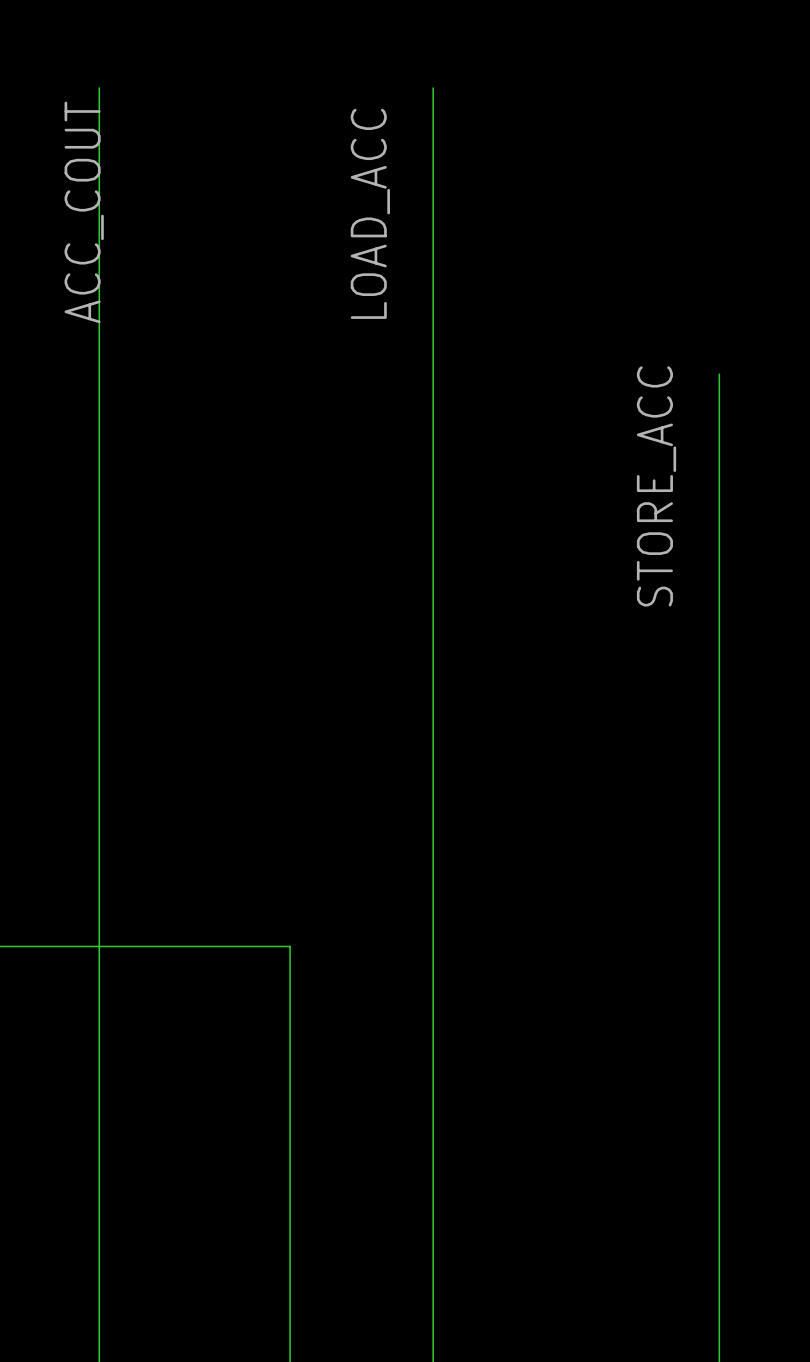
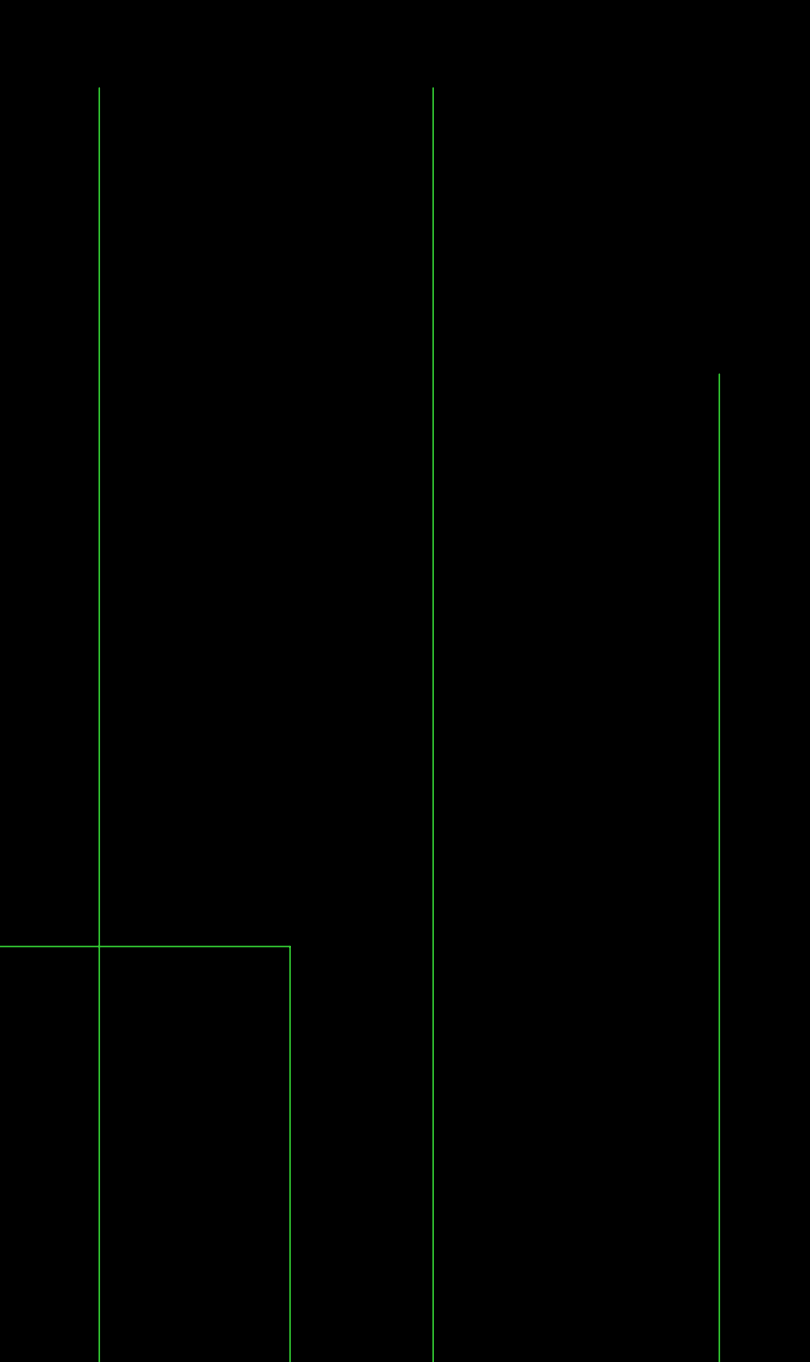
label: ACC_COUT (84, 212) -> none
label: LOAD_ACC (370, 213) -> none
label: STORE_ACC (656, 486) -> none

